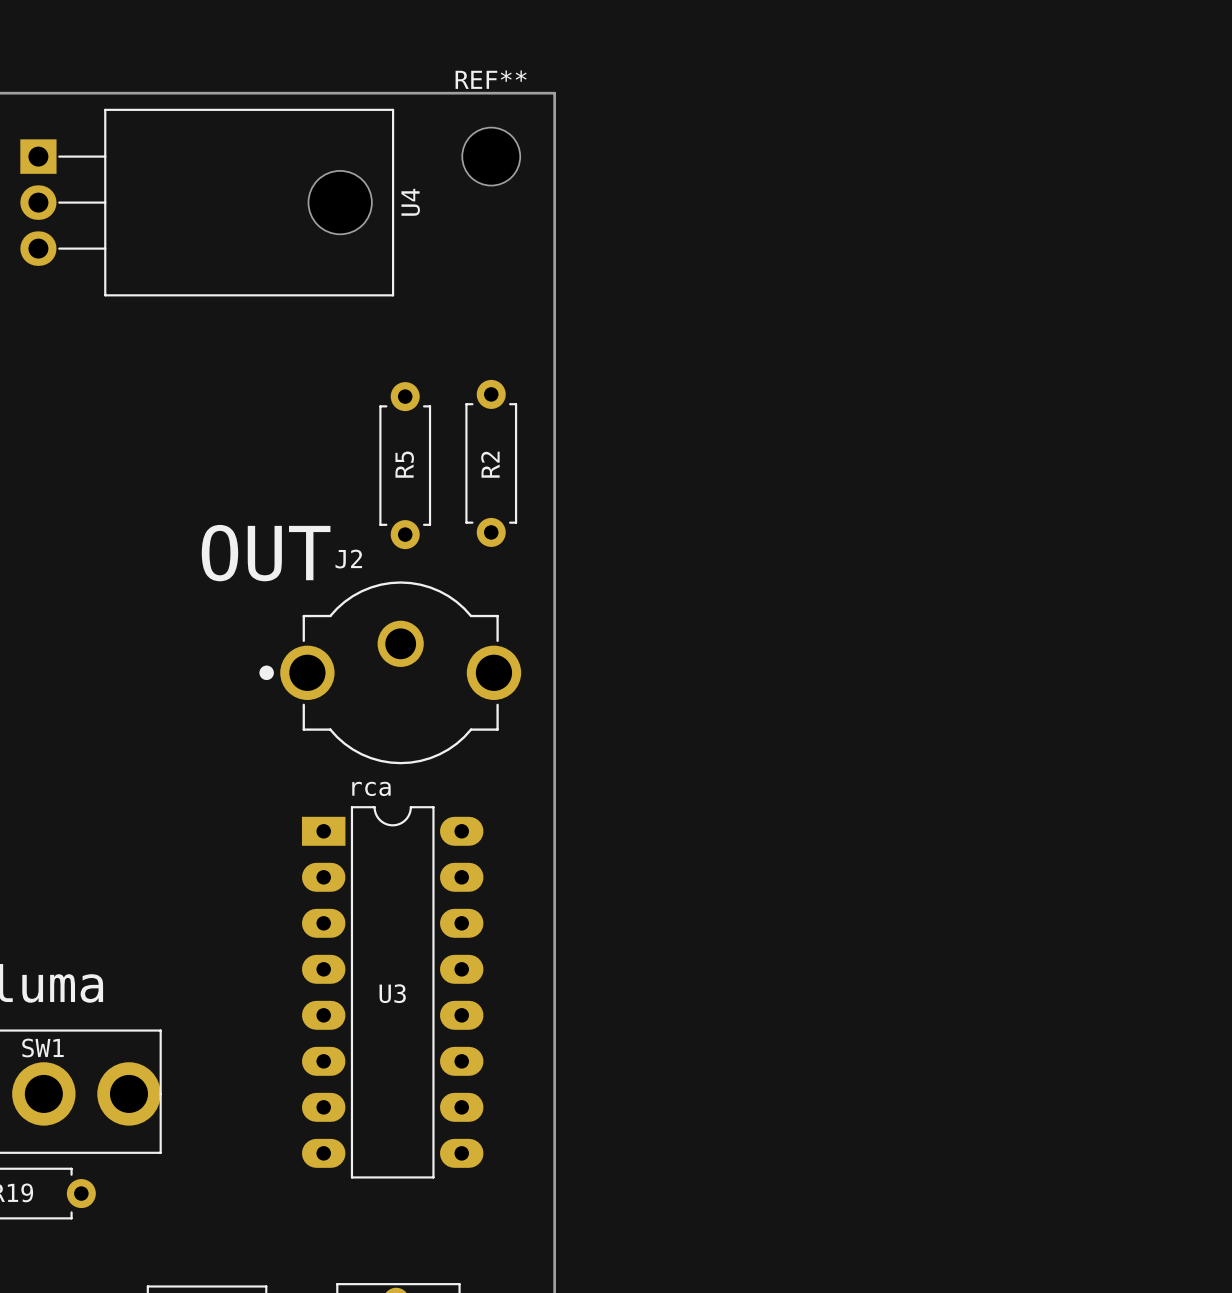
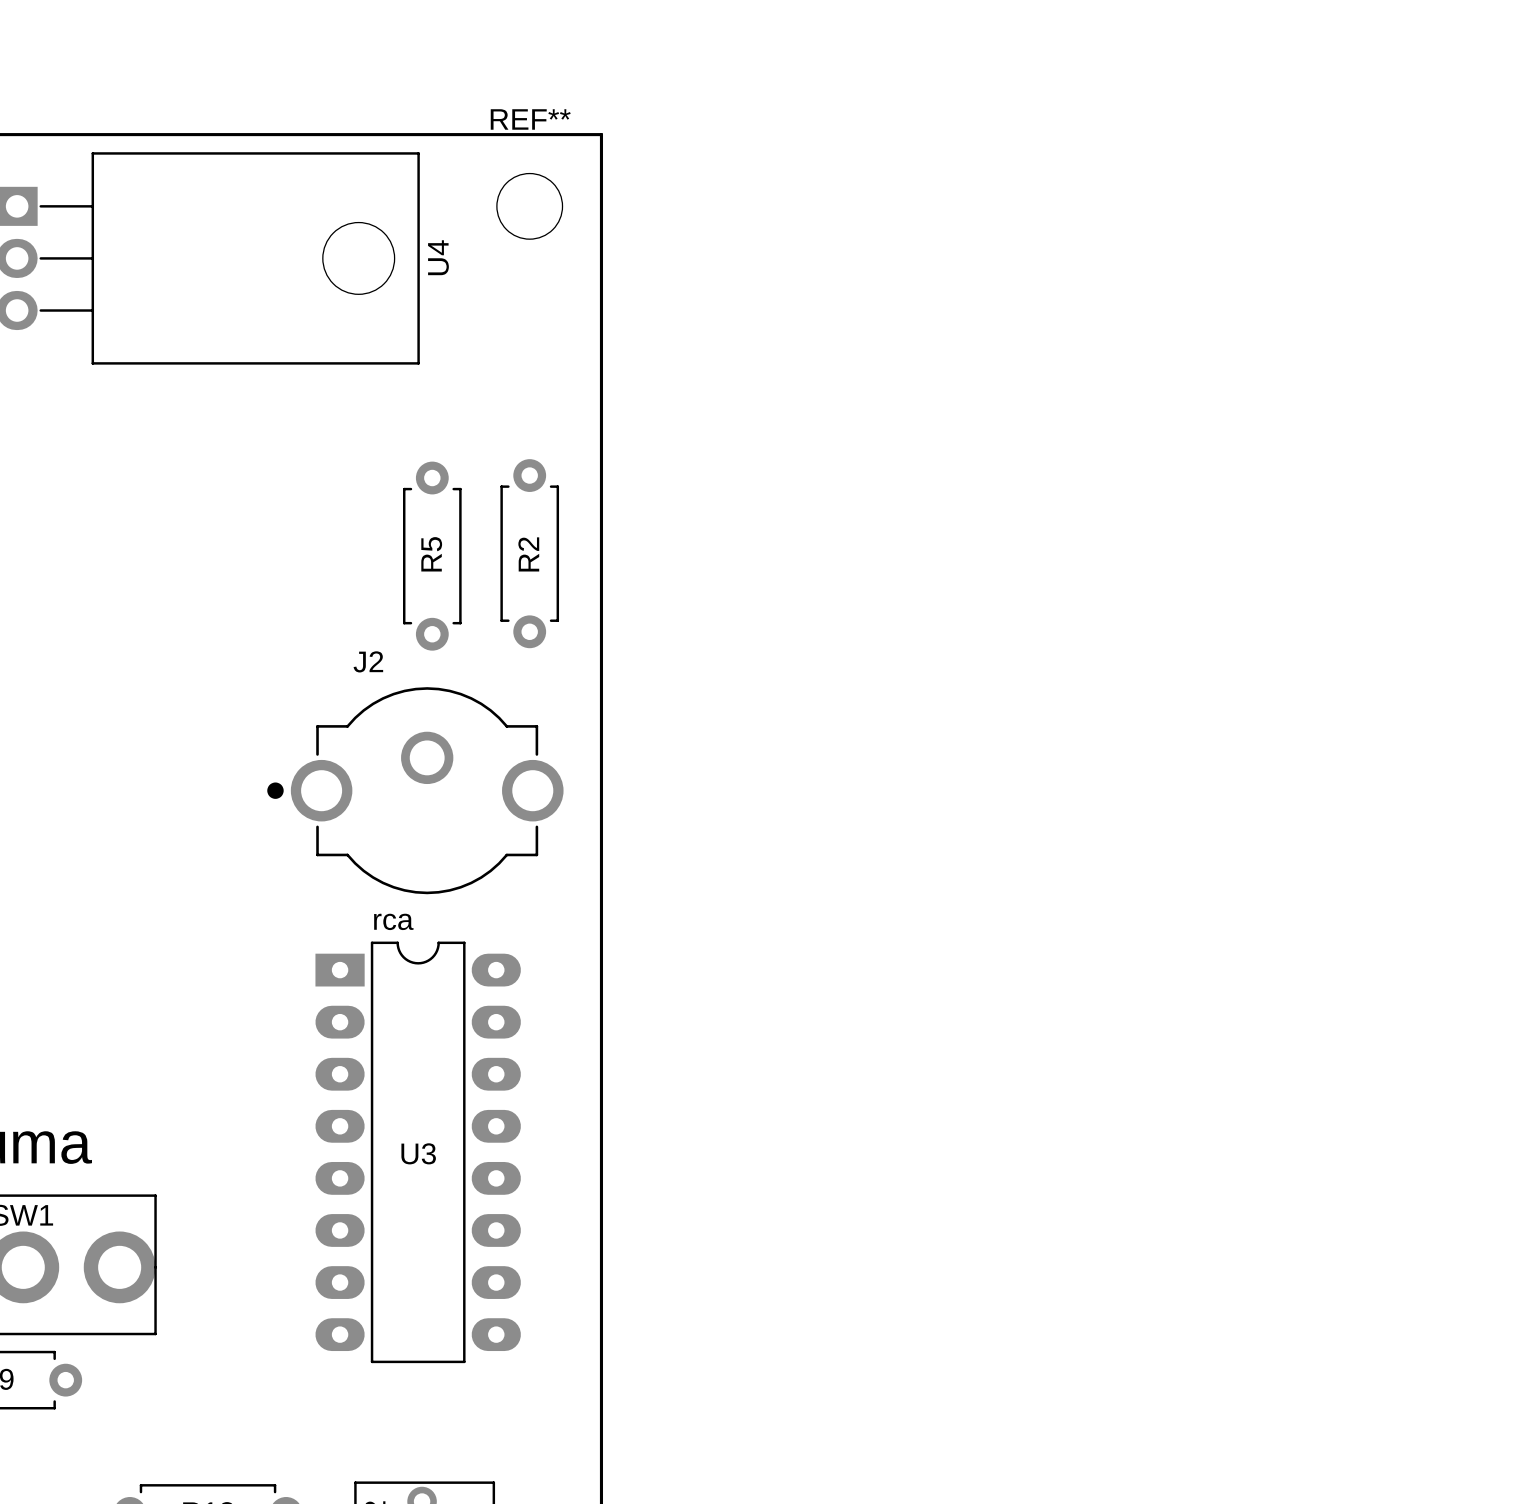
text: OUT (266, 553) -> none

